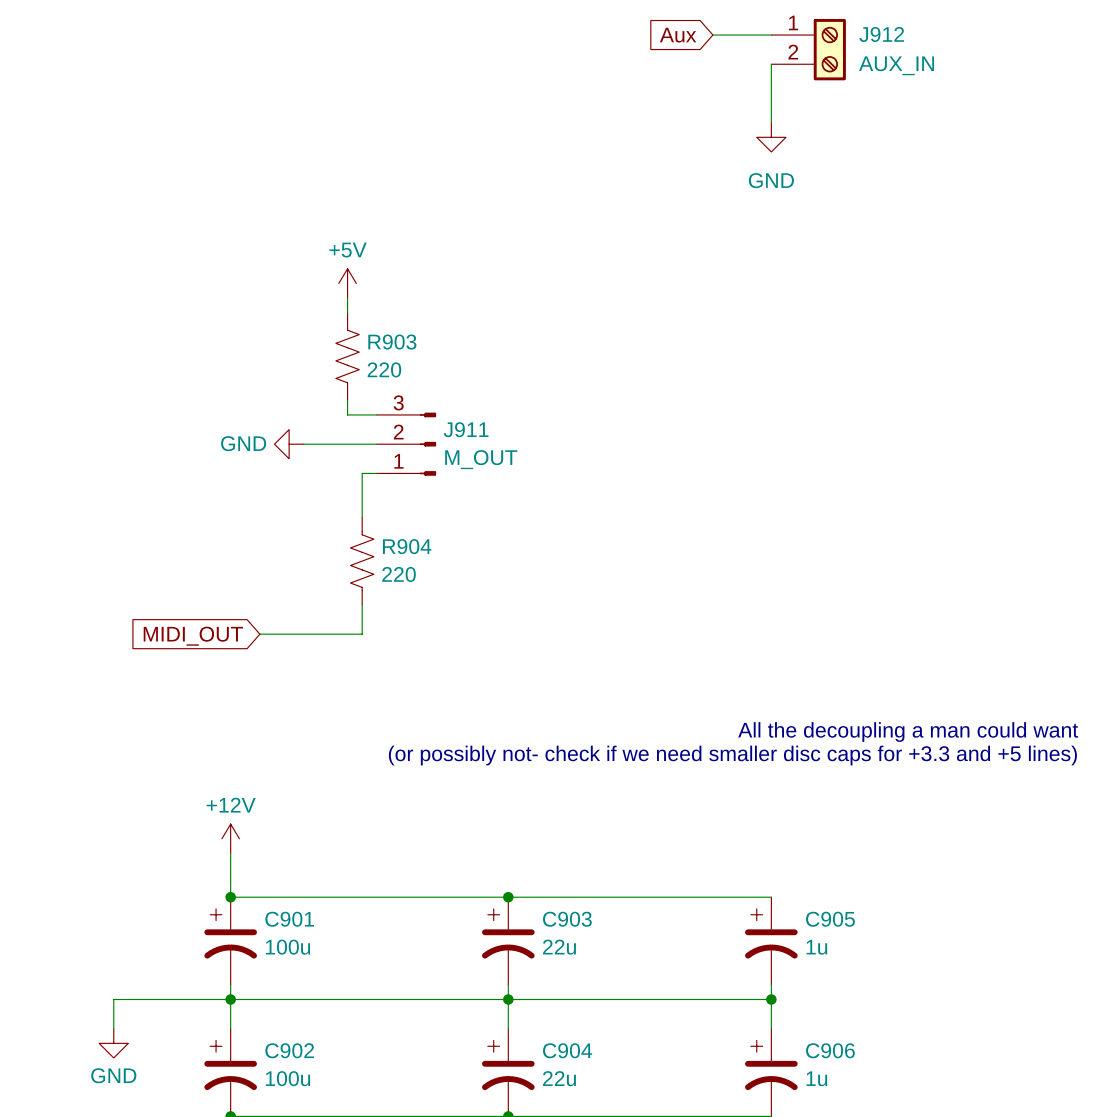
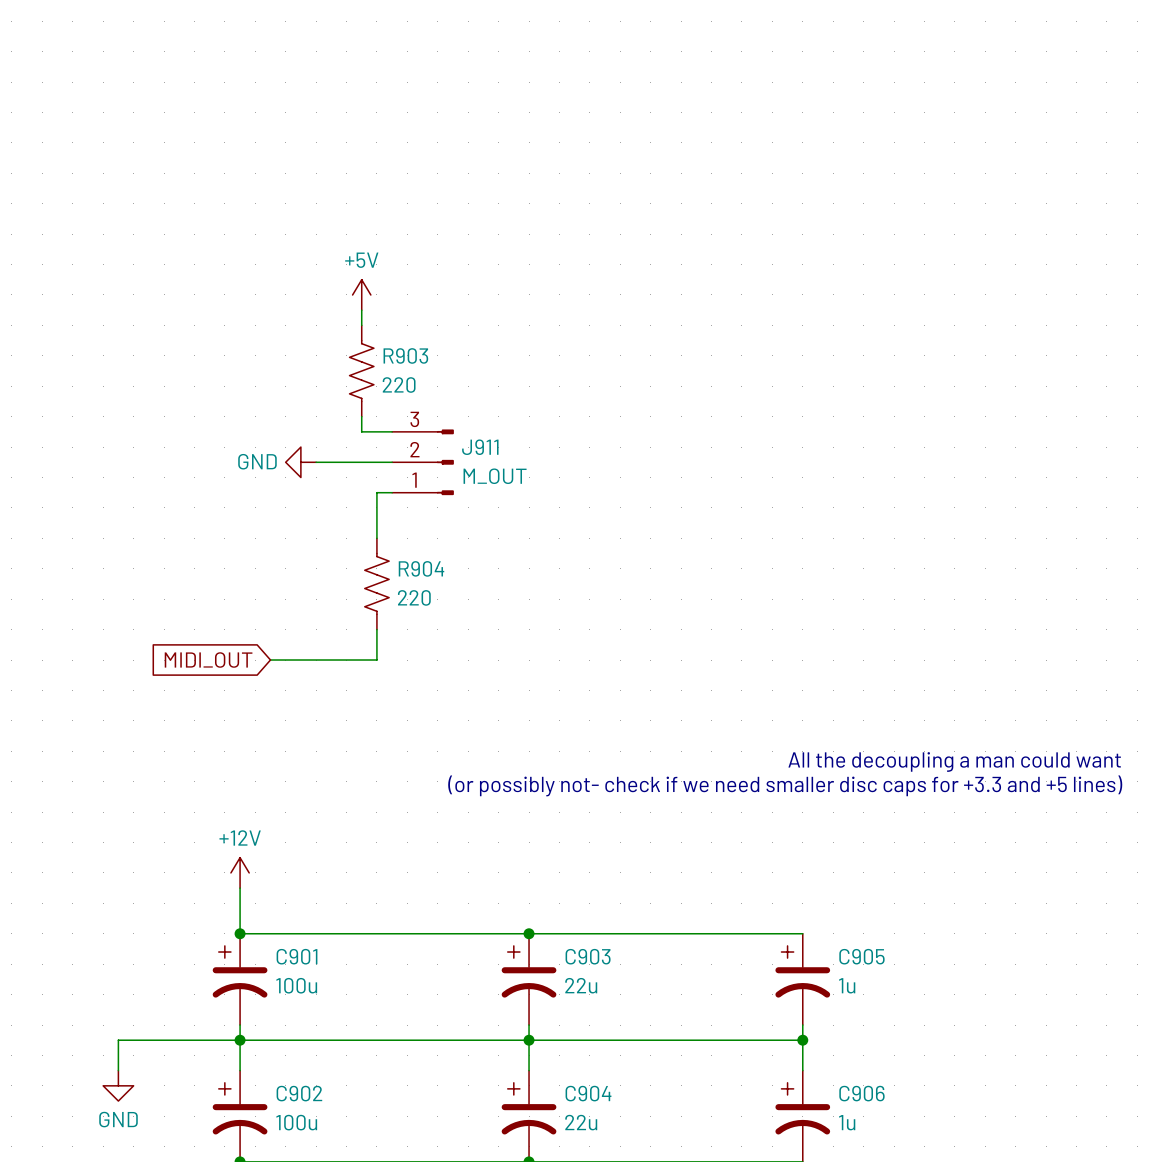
global label: Aux (678, 35) -> none
wire: (712, 35) (771, 35) -> none
J912: AUX_IN (808, 49) -> none
wire: (771, 64) (771, 122) -> none
power symbol: GND (771, 137) -> none

